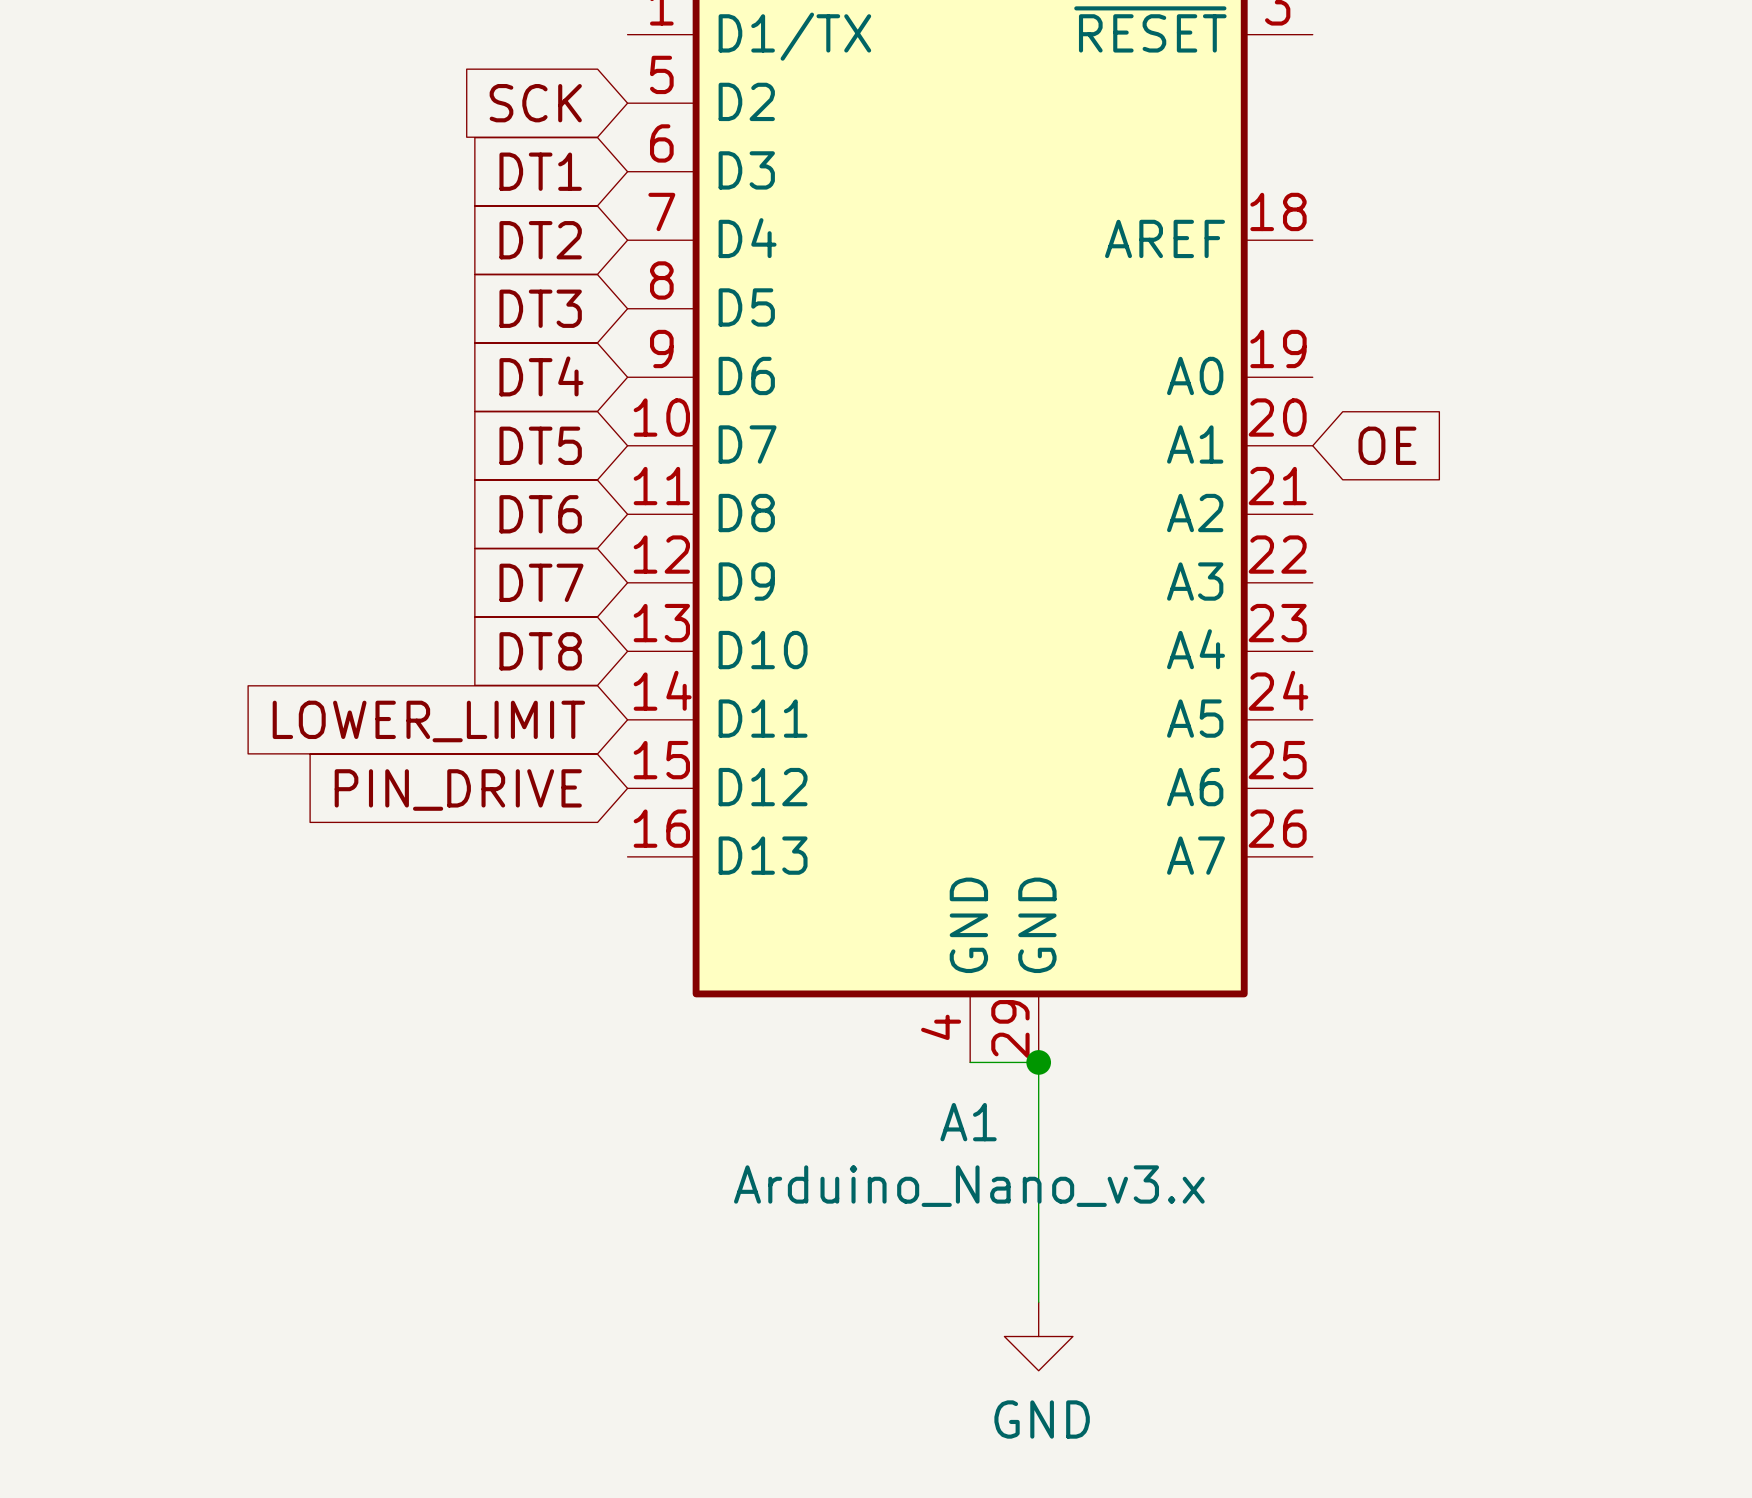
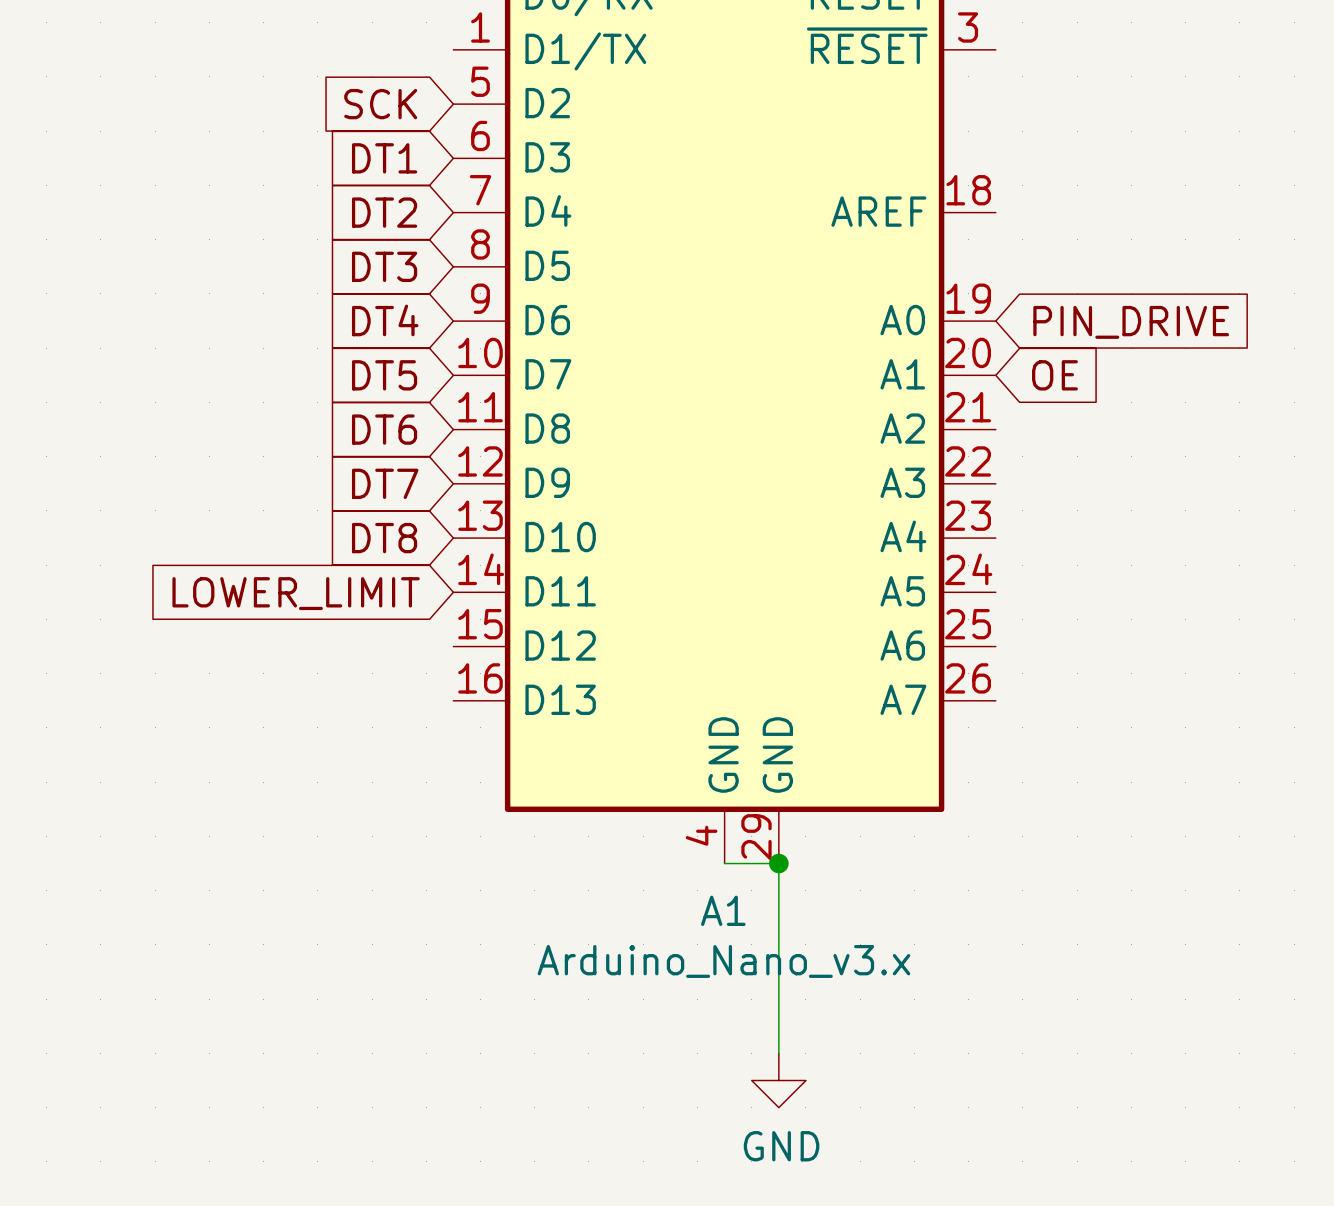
global label: none -> PIN_DRIVE (1131, 322)
global label: PIN_DRIVE (458, 790) -> none

